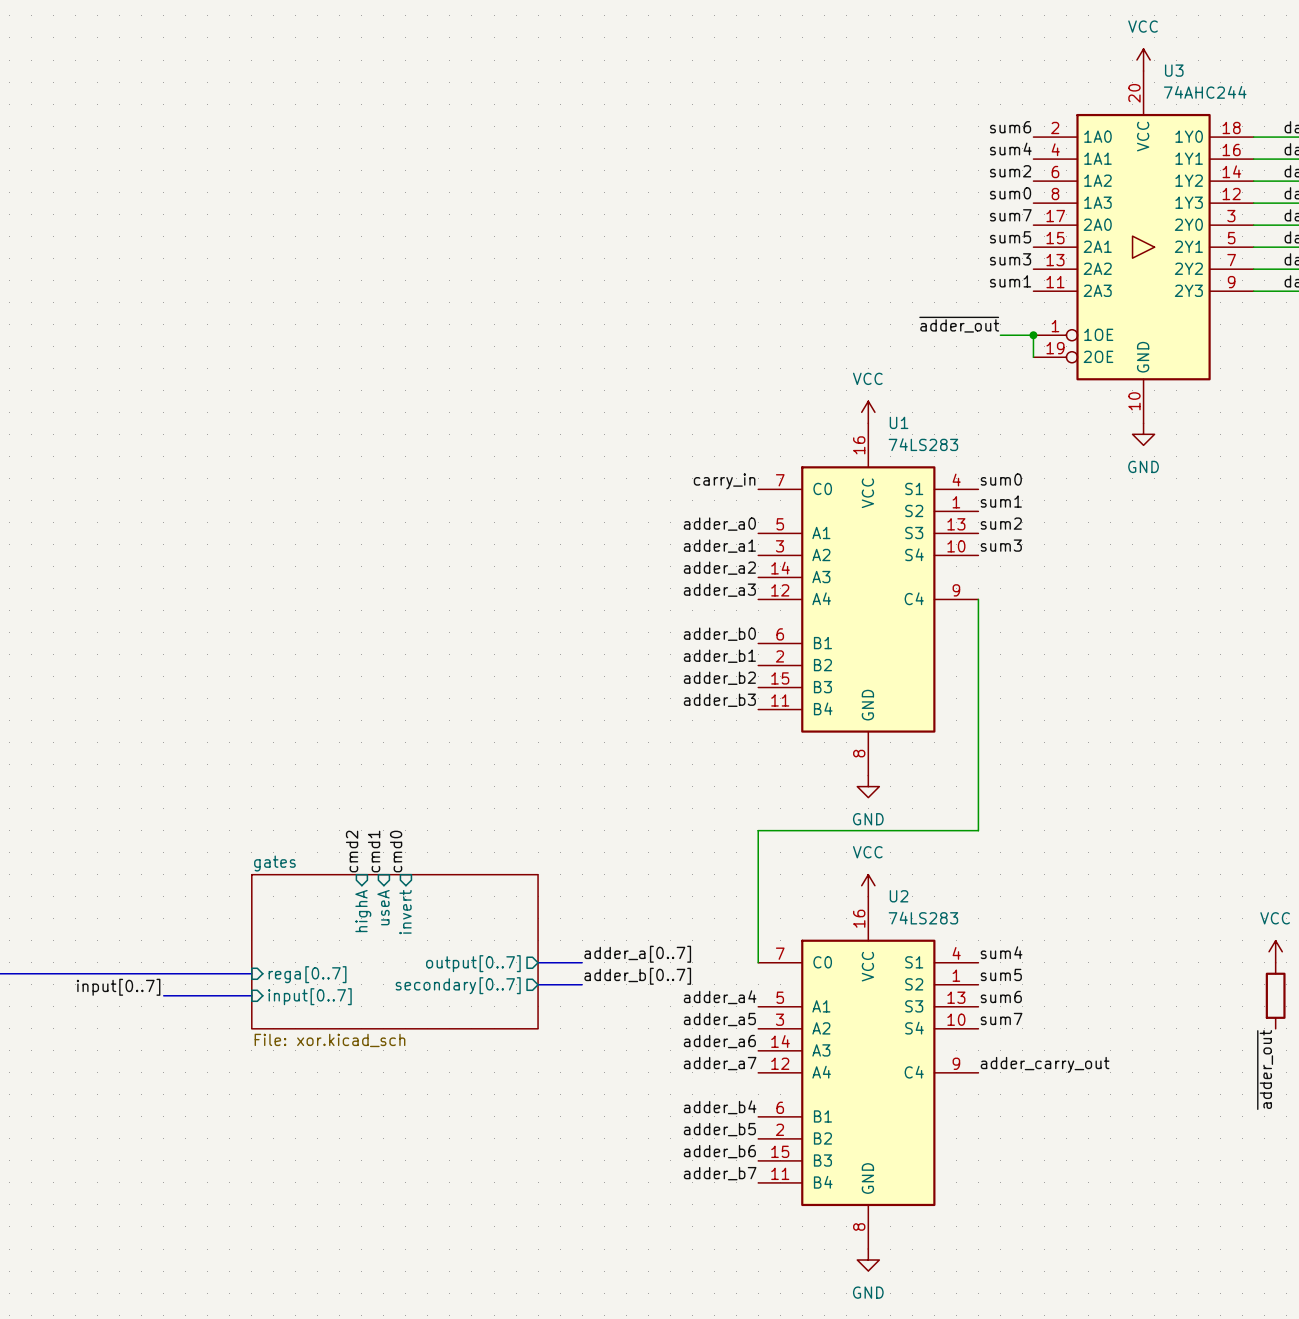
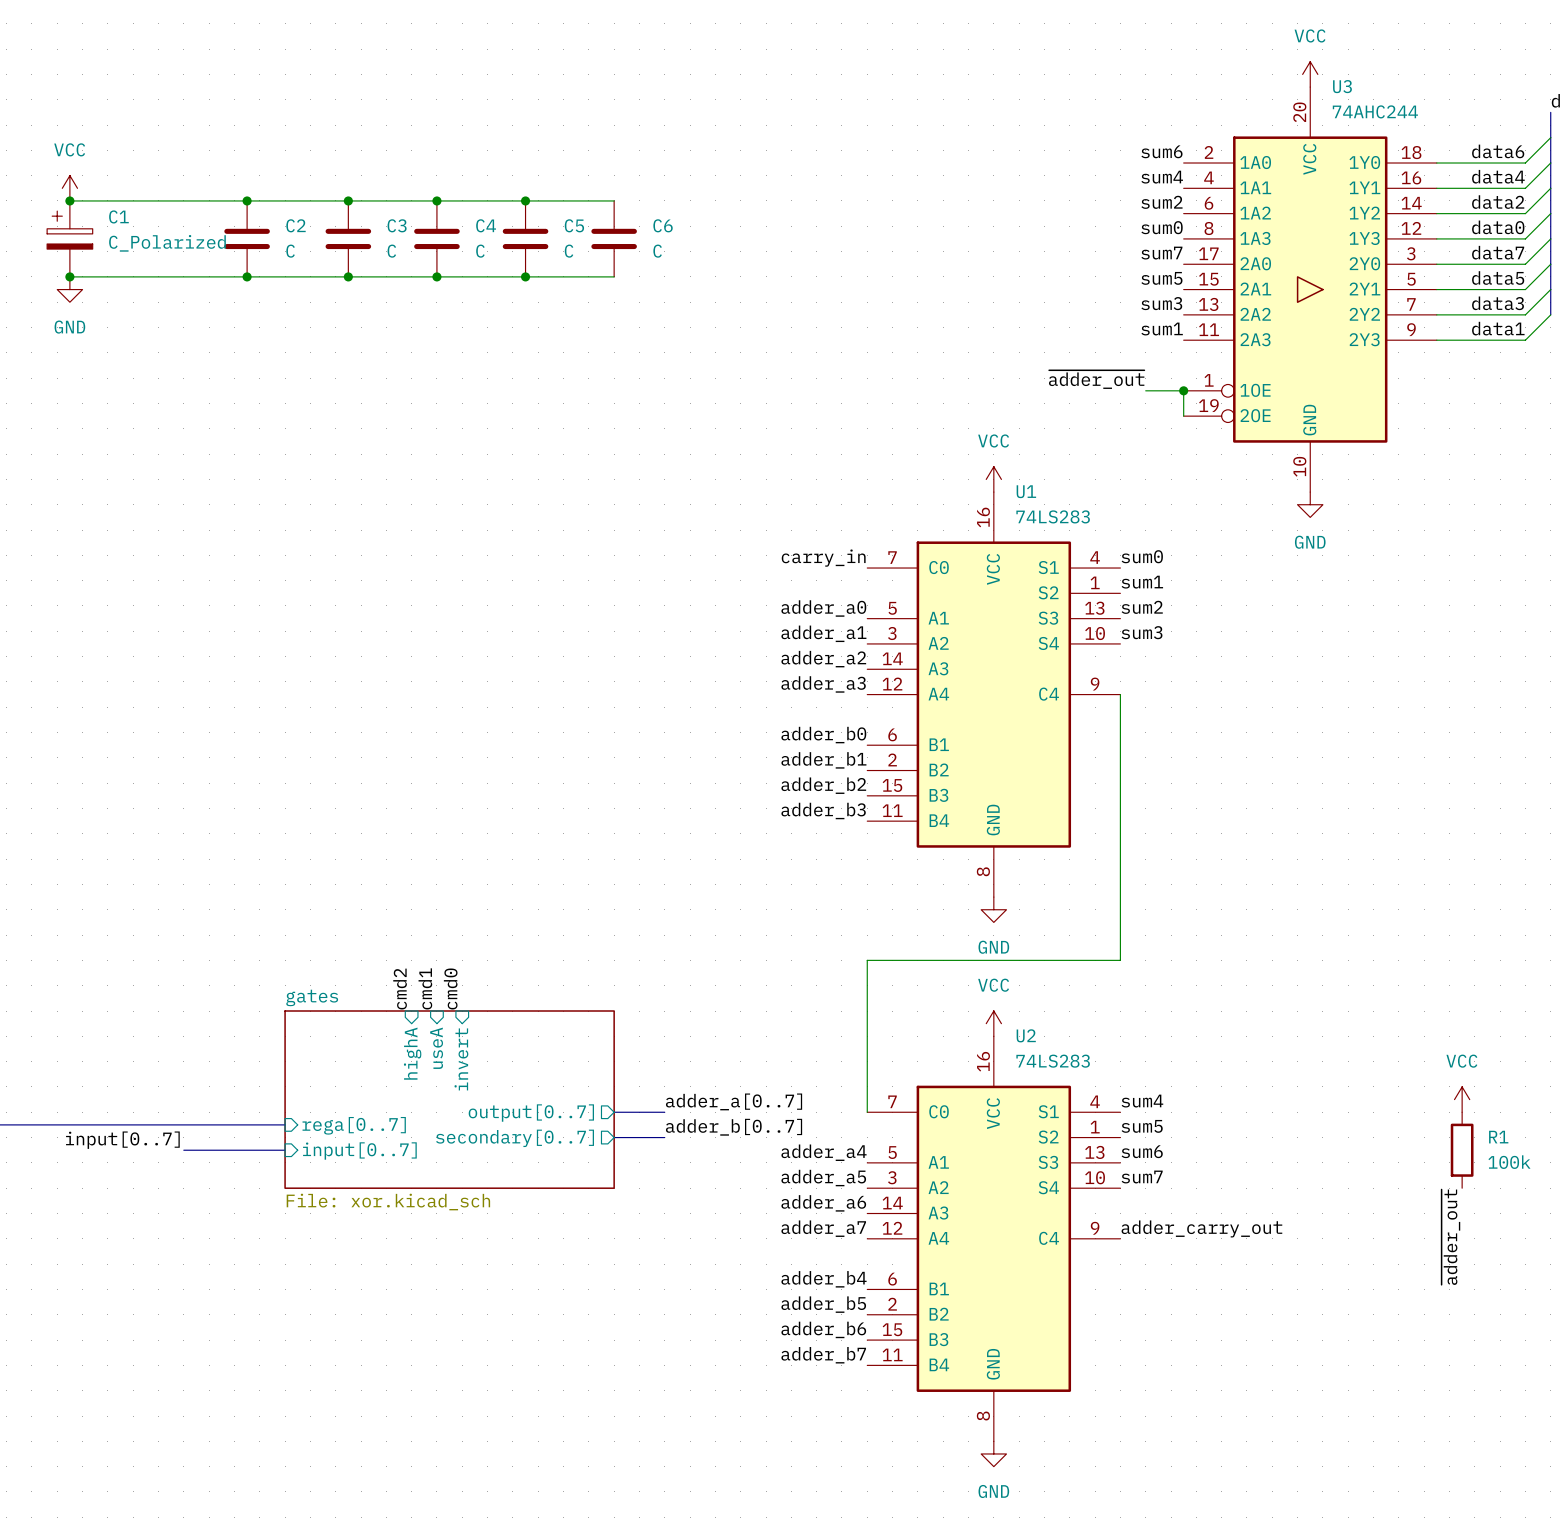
power symbol: none -> VCC (69, 188)
wire: none -> (69, 200) (614, 200)
junction: none -> (69, 200)
junction: none -> (247, 200)
junction: none -> (348, 200)
junction: none -> (436, 200)
junction: none -> (525, 200)
C1: none -> C_Polarized (69, 238)
C2: none -> C (247, 238)
C3: none -> C (348, 238)
C4: none -> C (436, 238)
C5: none -> C (525, 238)
C6: none -> C (614, 238)
wire: none -> (69, 276) (614, 276)
junction: none -> (69, 276)
junction: none -> (247, 276)
junction: none -> (348, 276)
junction: none -> (436, 276)
junction: none -> (525, 276)
power symbol: none -> GND (69, 289)

